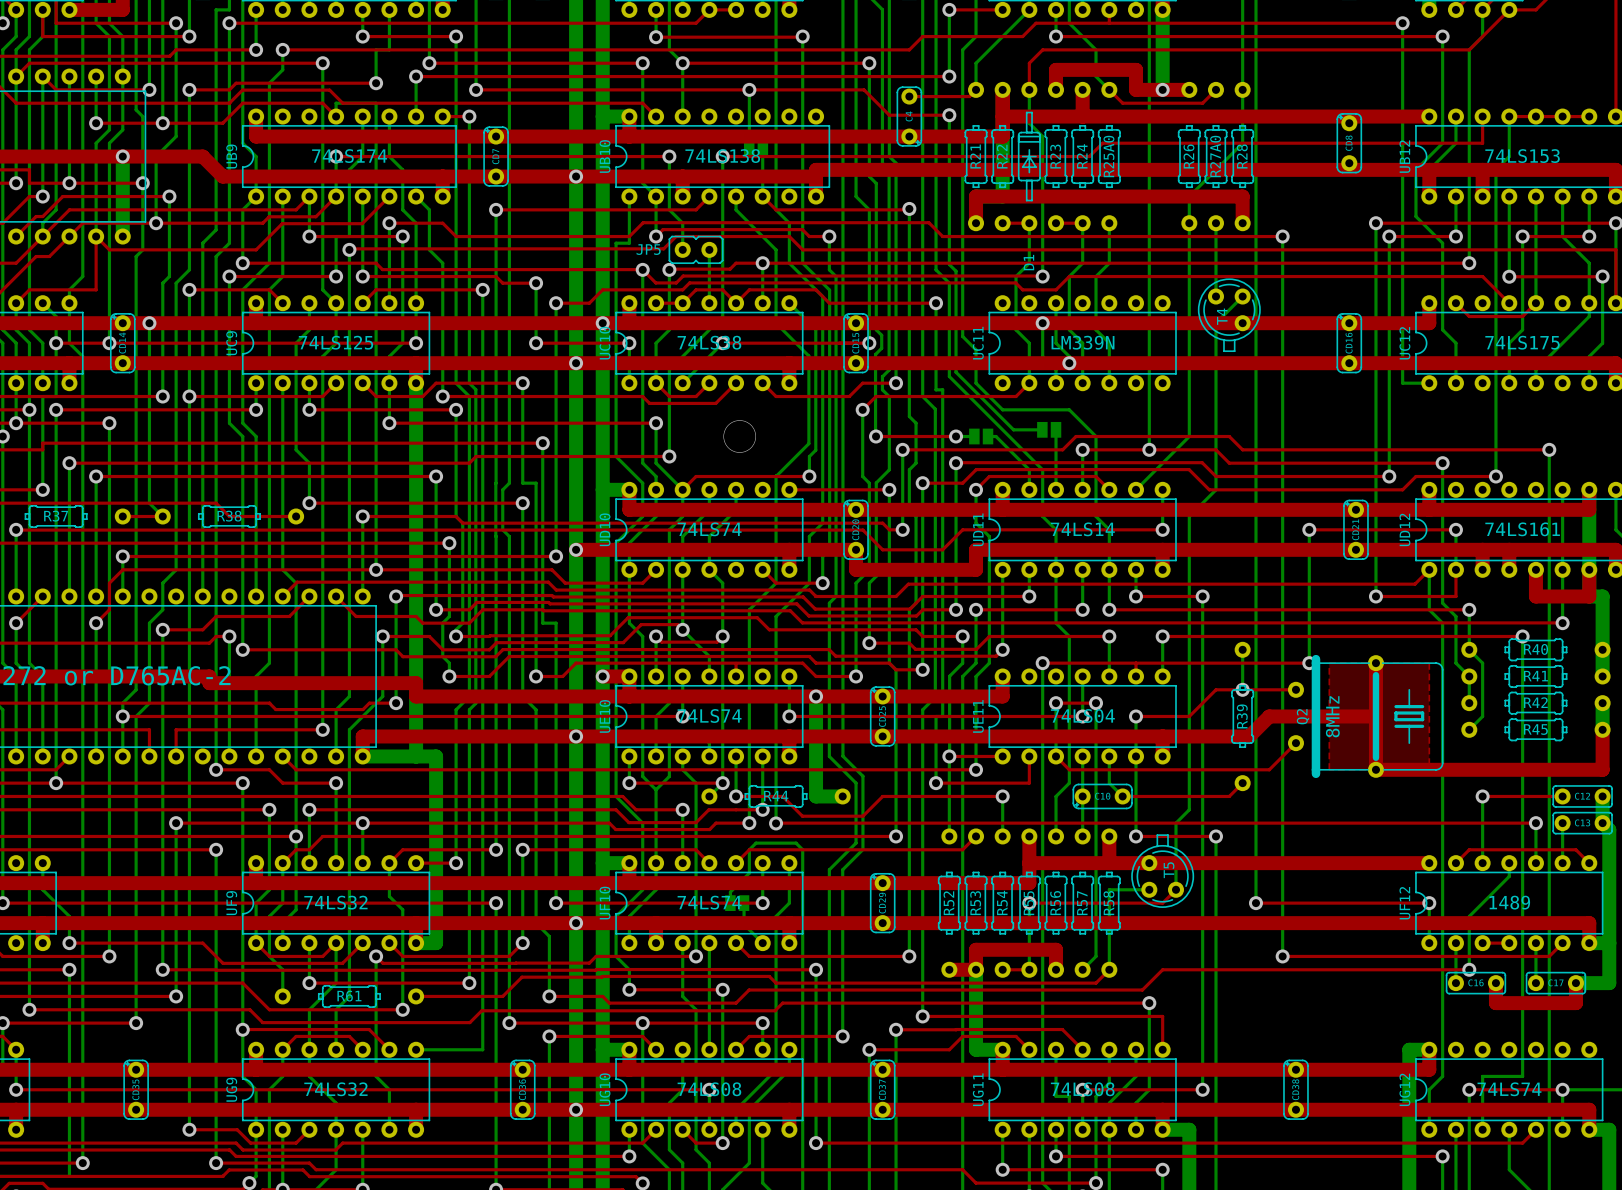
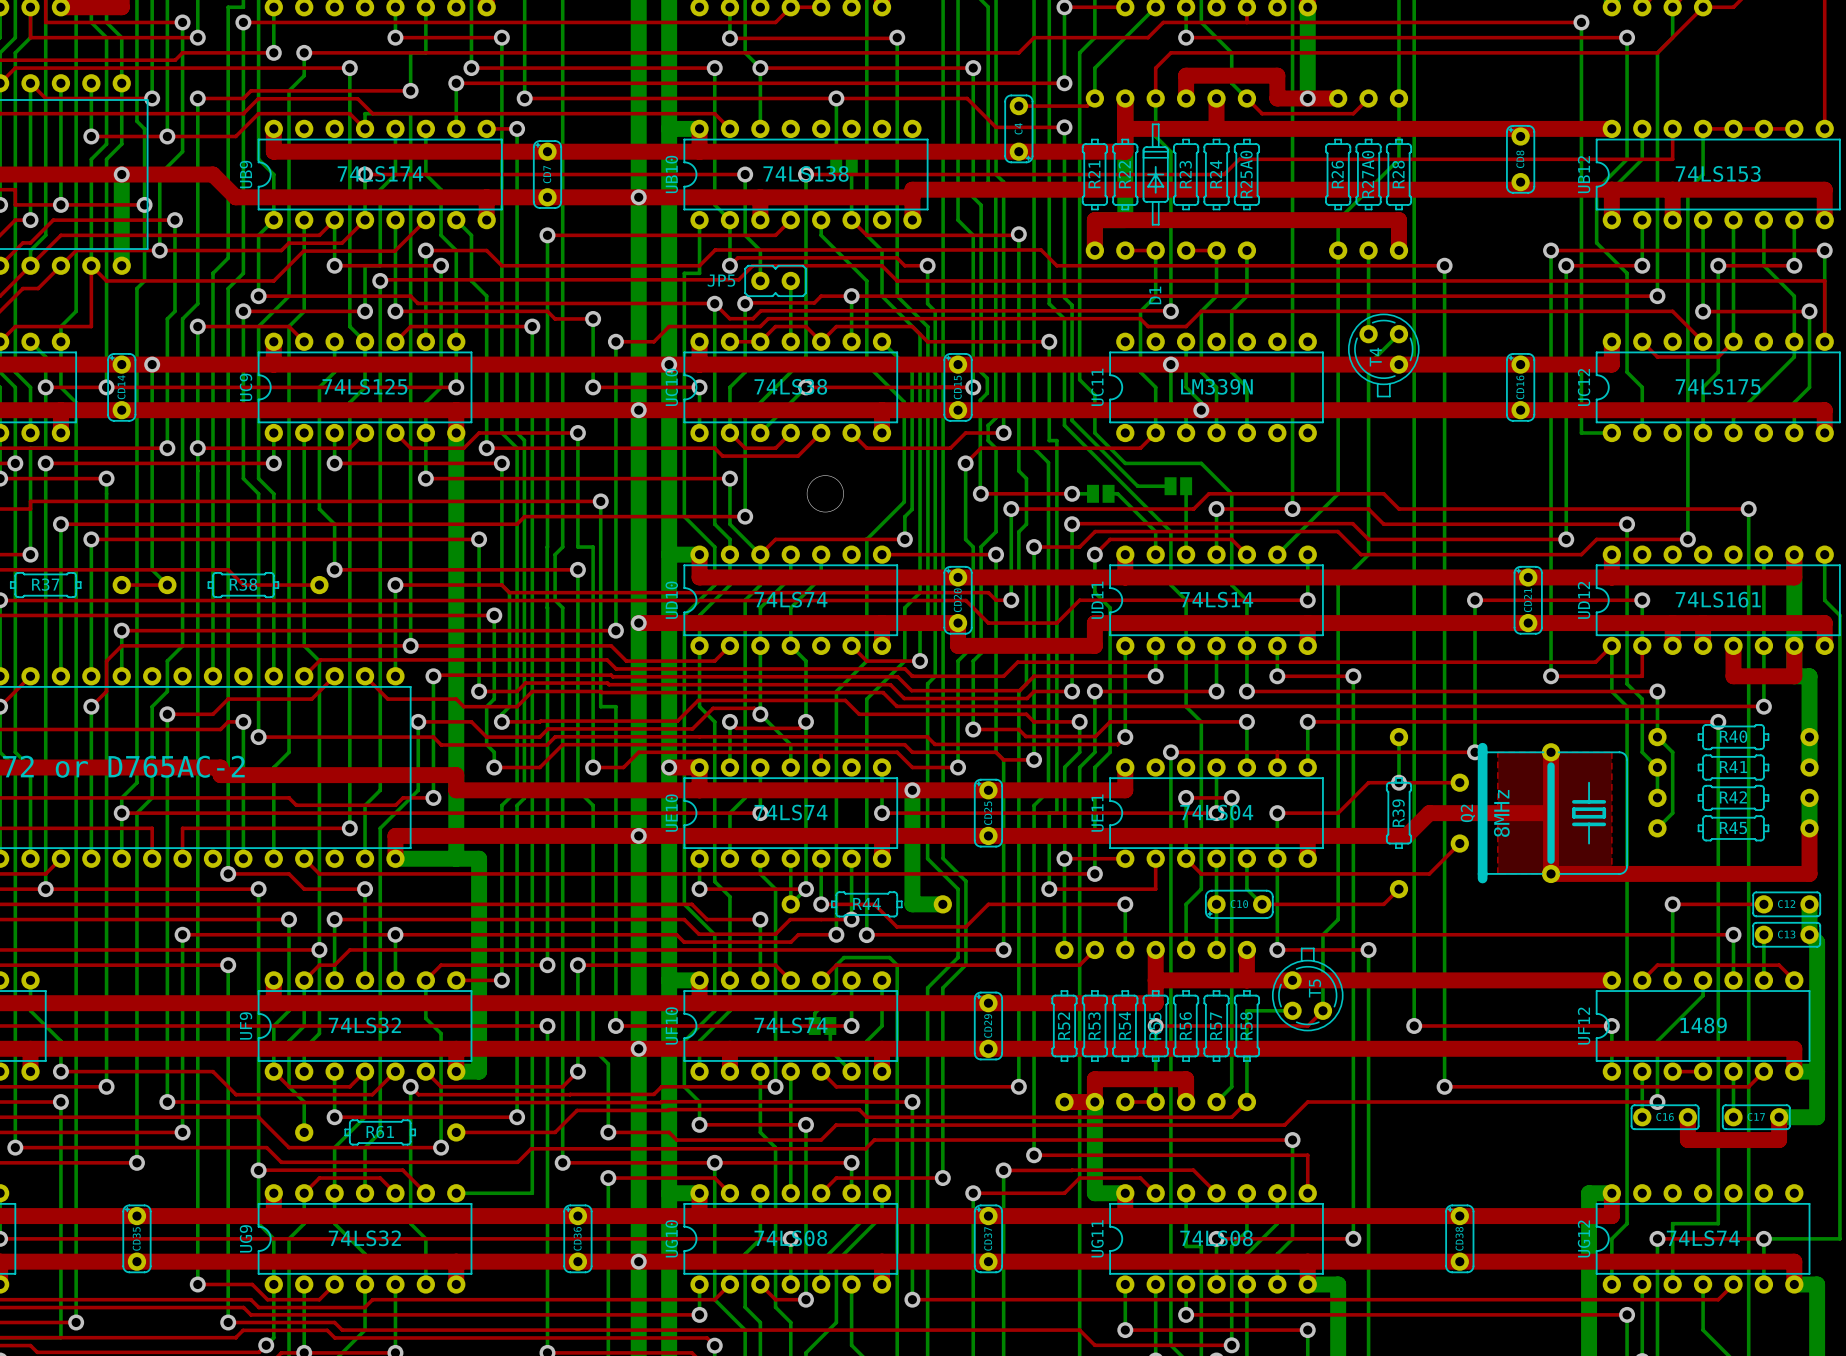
bottom track: (709, 756) (709, 743) (702, 736) (676, 736) (669, 743) (669, 776) (656, 789) -> (790, 858) (790, 904)

